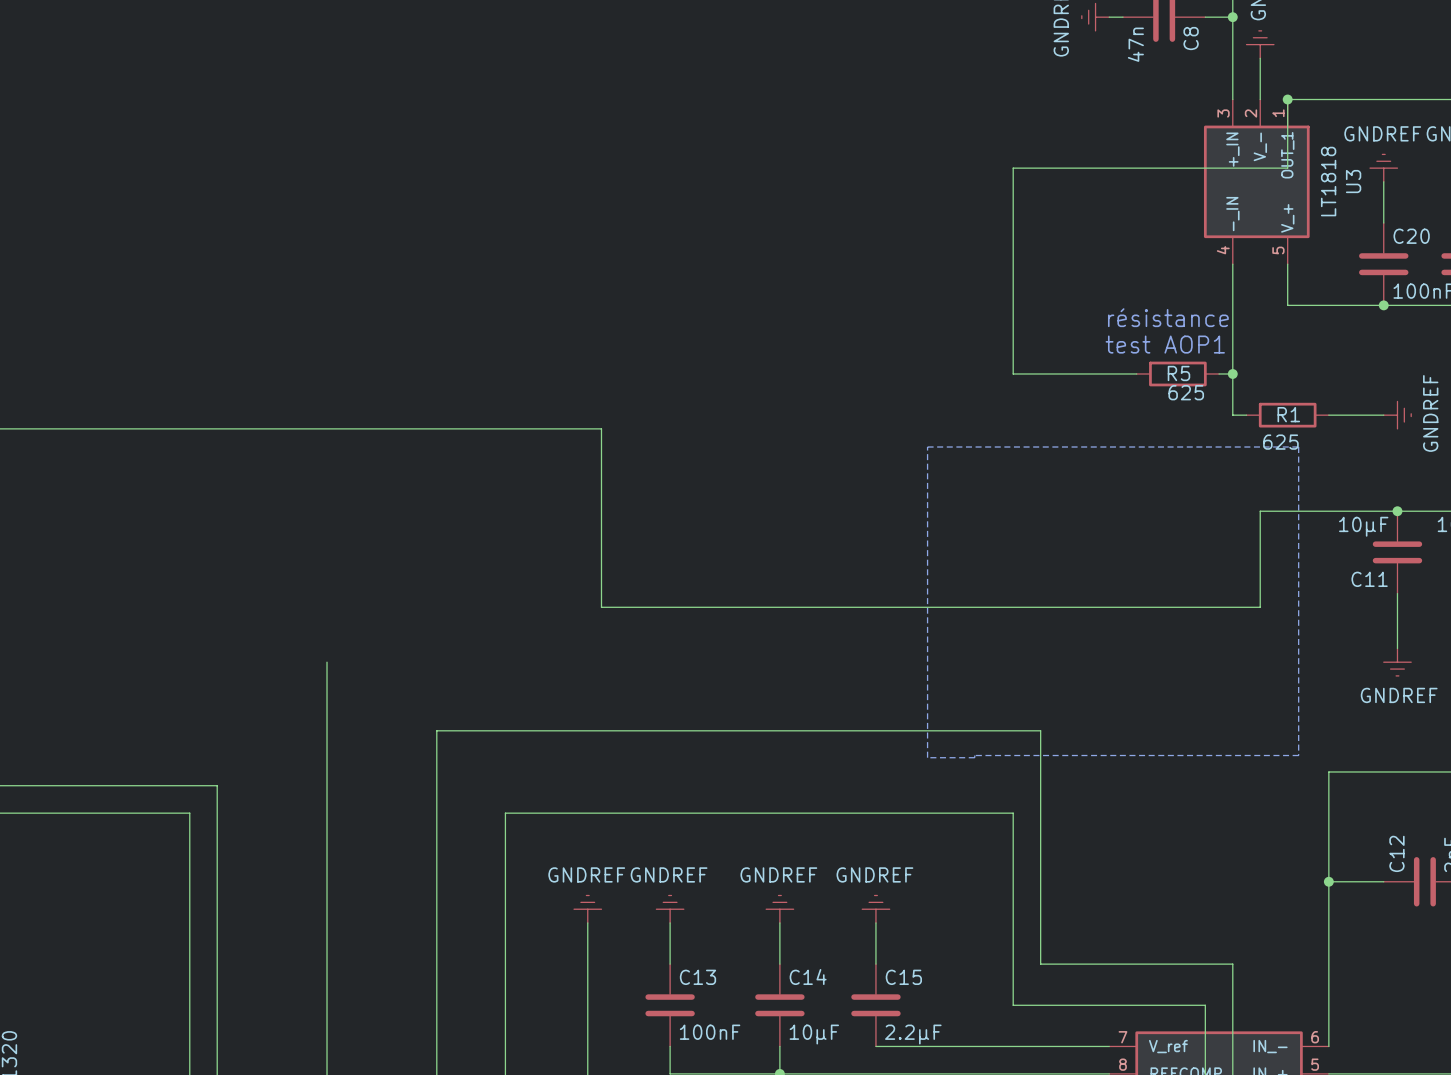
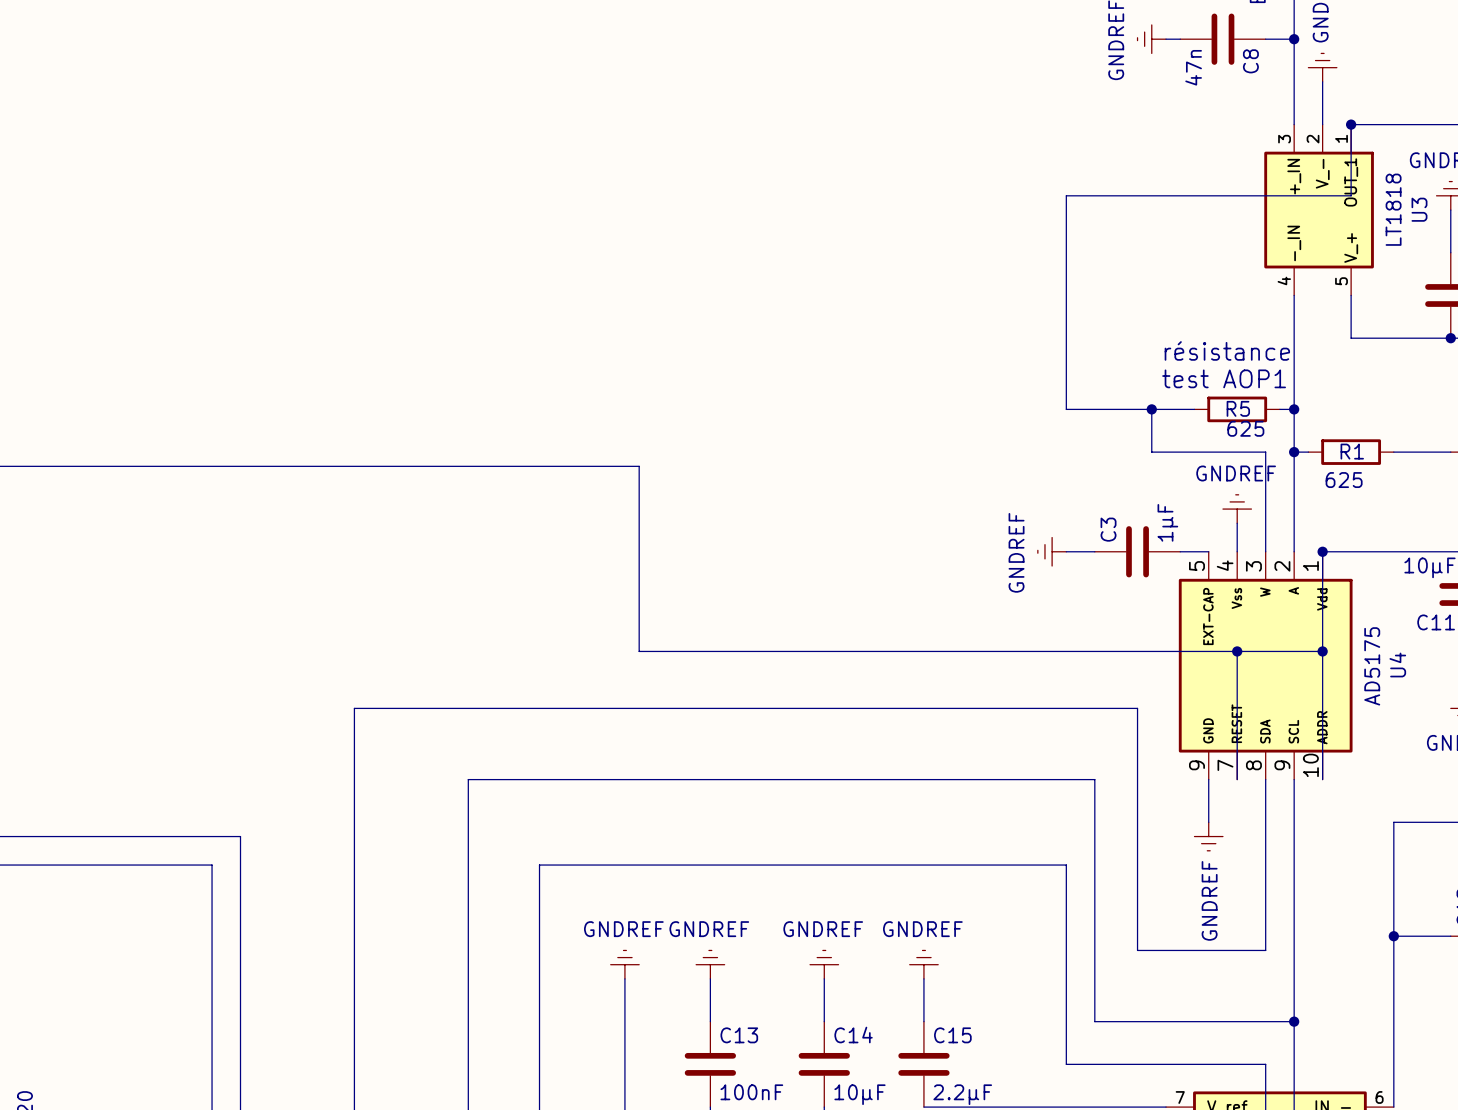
wire: none -> (1151, 409) (1151, 452) (1265, 452) (1265, 551)
junction: none -> (1151, 409)
wire: none -> (1294, 452) (1294, 551)
junction: none -> (1294, 452)
line: (927, 447) (927, 757) (974, 757) (974, 755) (1298, 755) (1298, 447) (927, 447) -> none
power symbol: none -> GNDREF (1237, 509)
wire: none -> (1237, 523) (1237, 551)
power symbol: none -> GNDREF (1052, 551)
wire: none -> (1066, 551) (1094, 551)
C3: none -> 1µF (1137, 551)
wire: none -> (1180, 551) (1208, 551)
junction: none -> (1322, 551)
wire: none -> (1237, 651) (1237, 779)
junction: none -> (1237, 651)
wire: none -> (1322, 651) (1322, 779)
junction: none -> (1322, 651)
U4: none -> AD5175 (1265, 665)
wire: none -> (354, 708) (1137, 708) (1137, 950) (1265, 950) (1265, 779)
wire: none -> (1208, 779) (1208, 822)
wire: none -> (1294, 779) (1294, 1021)
power symbol: none -> GNDREF (1208, 836)
junction: none -> (1294, 1021)

